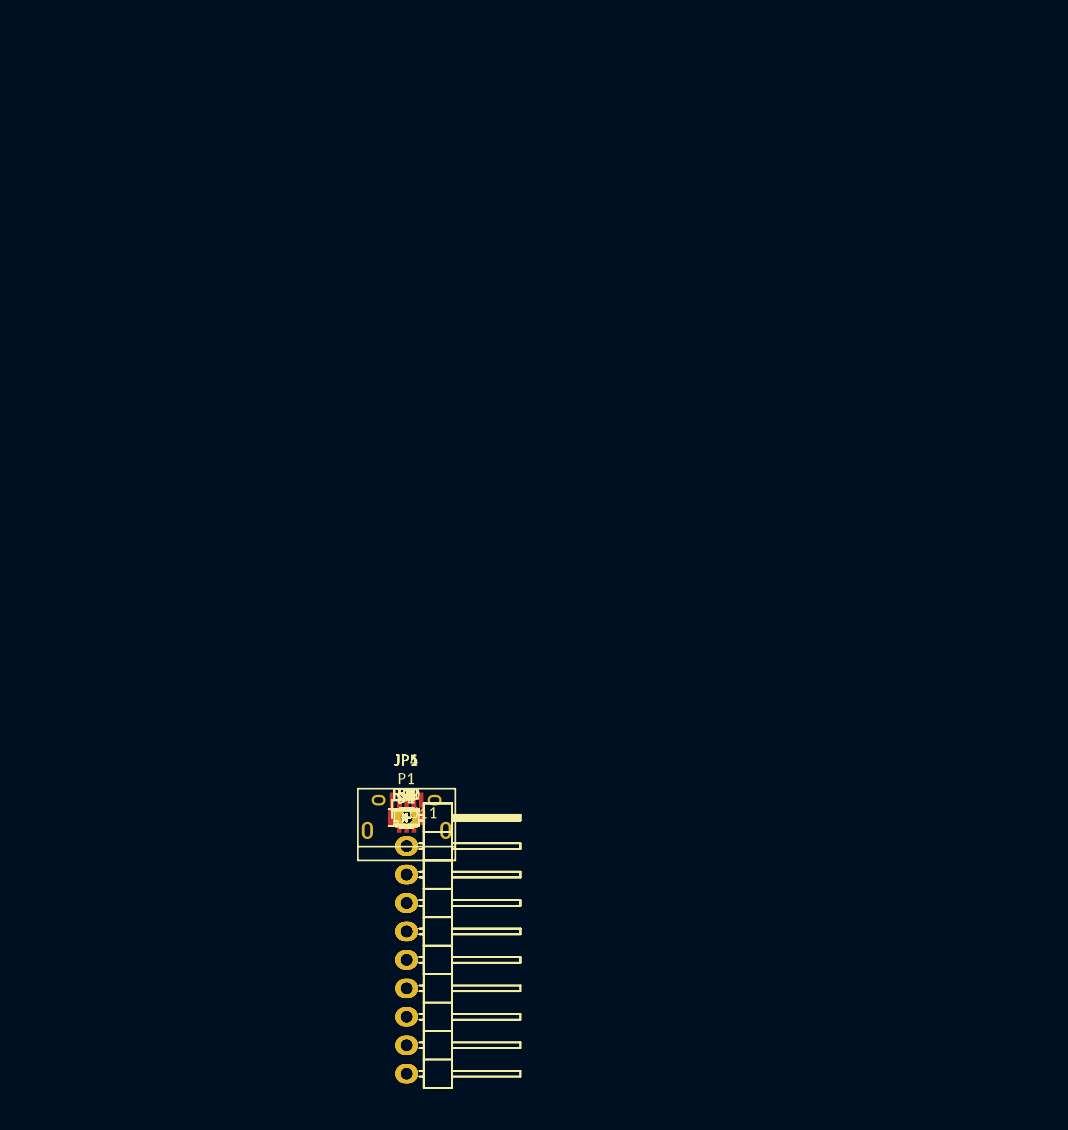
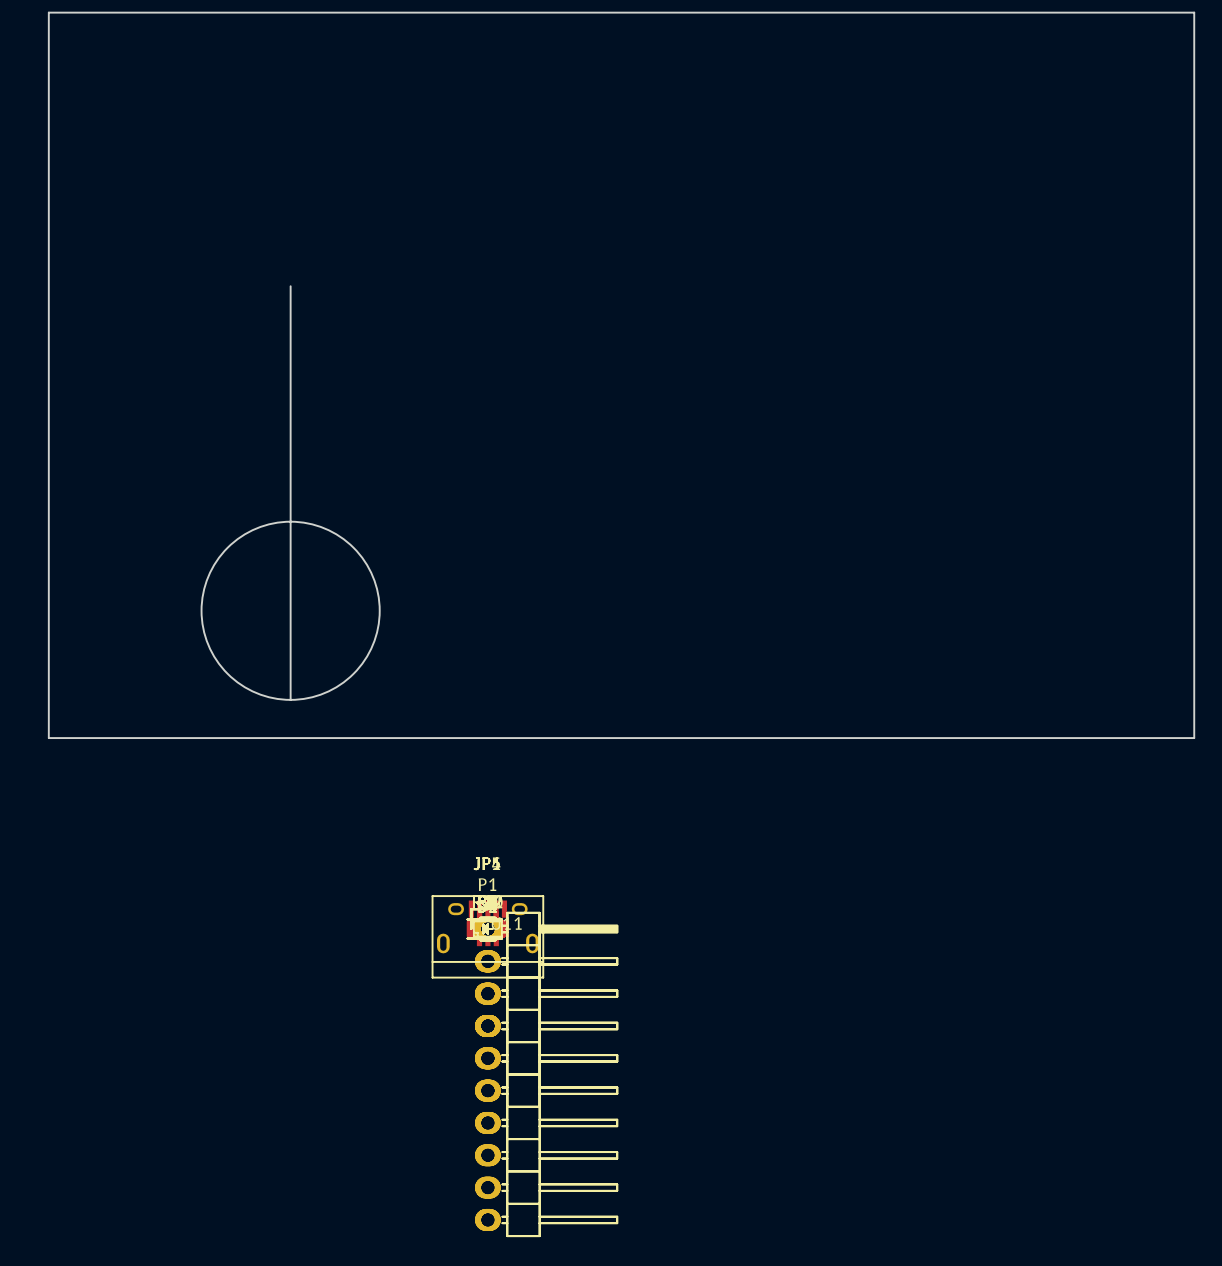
board edge: none -> (48, 12) (48, 738) (1194, 738) (1194, 12) (48, 12)
board edge: none -> (290, 286) (290, 699)
round board edge: none -> [200, 520, 381, 701]

